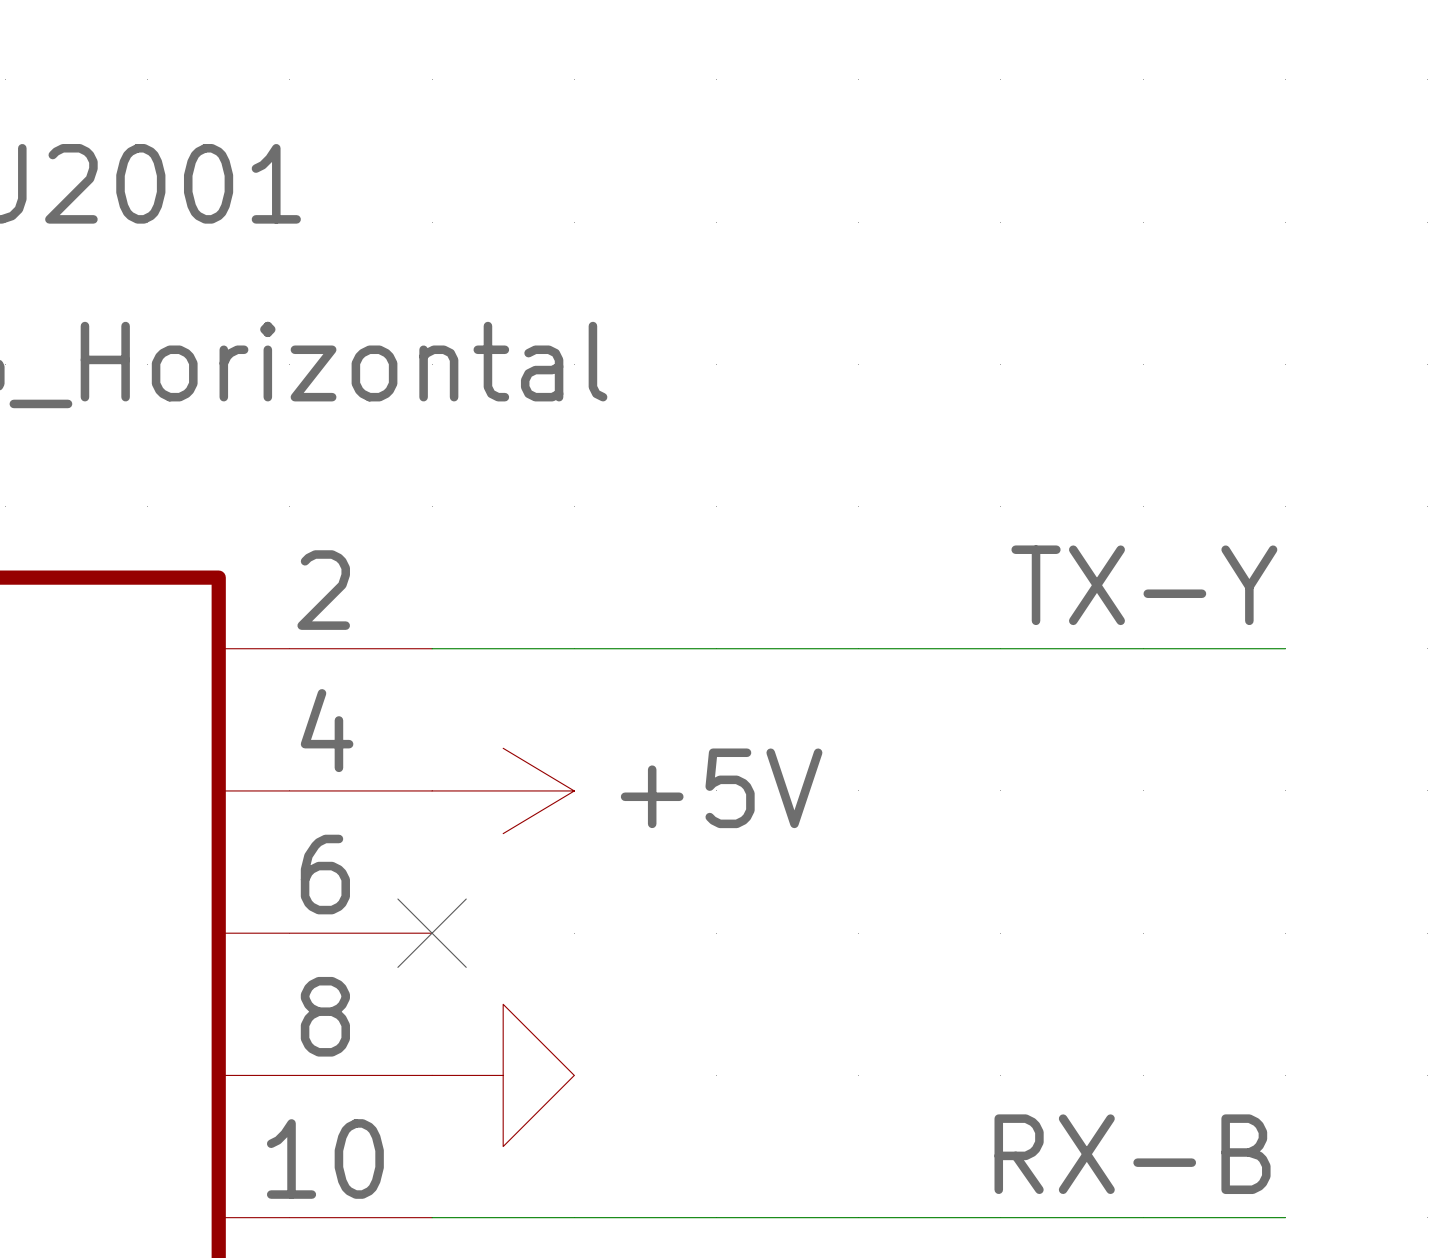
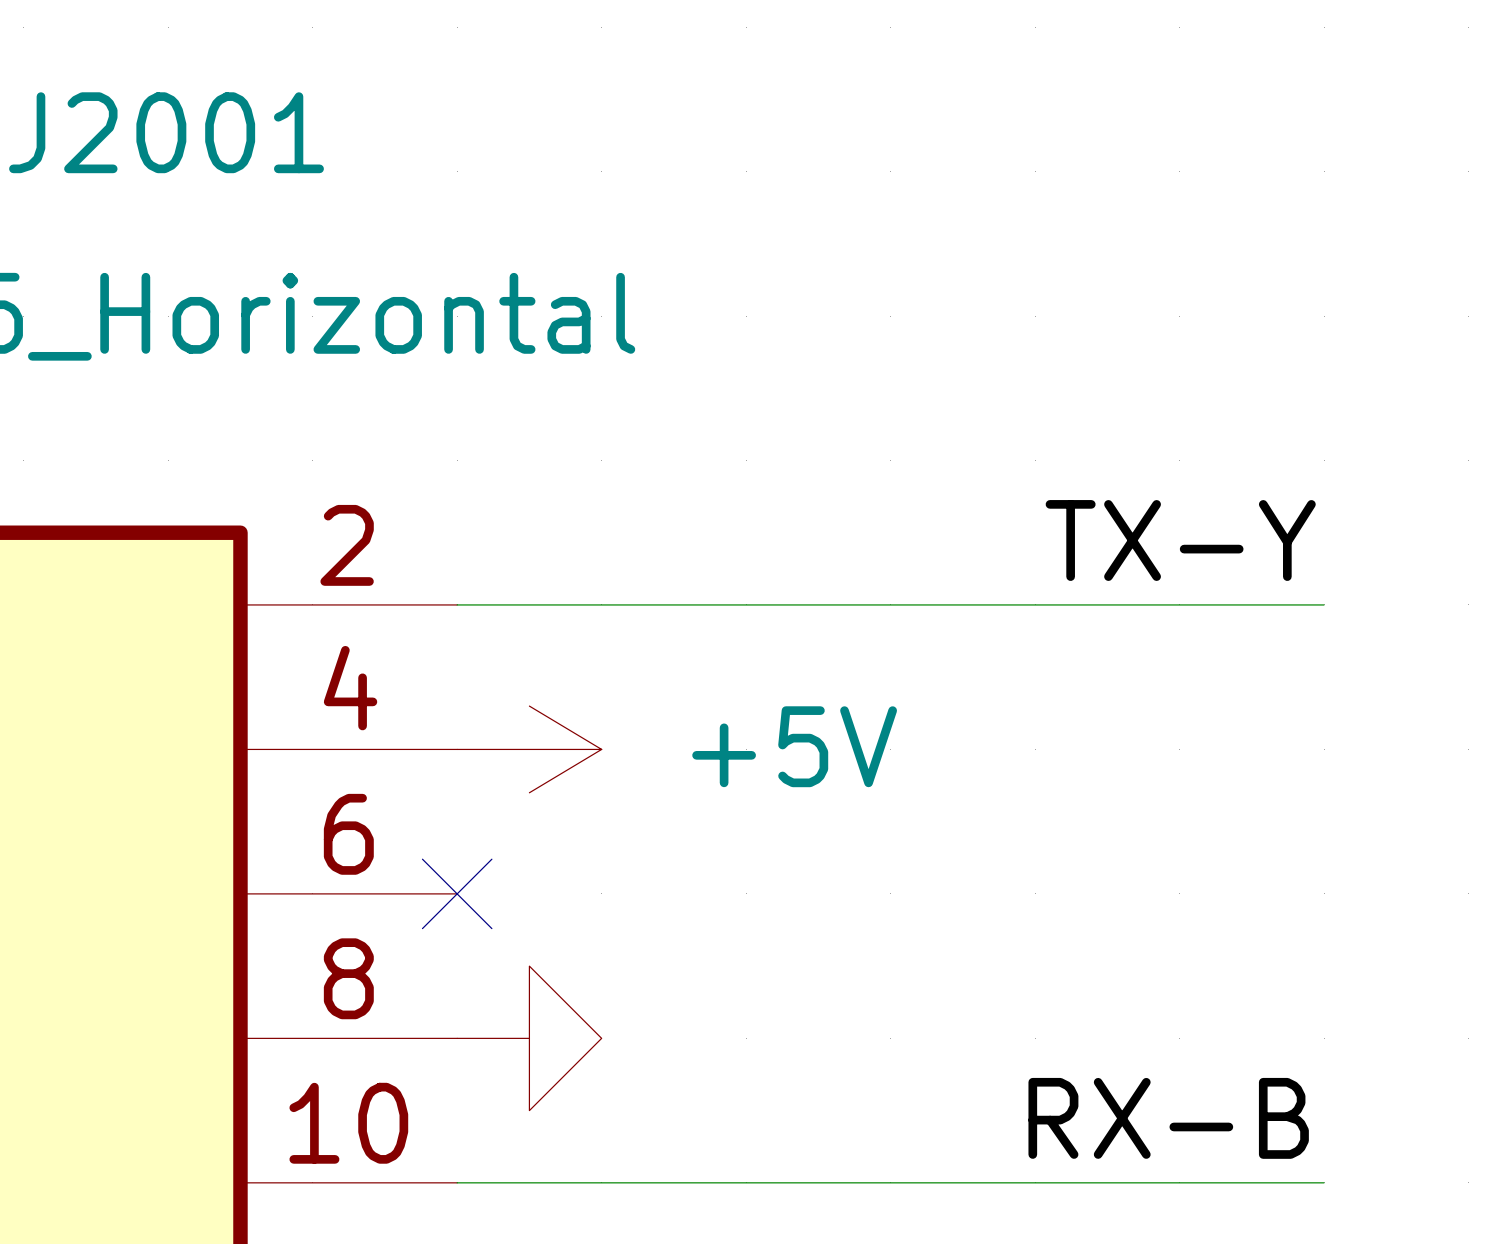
power symbol text position: +5V (721, 788) -> +5V (794, 746)

